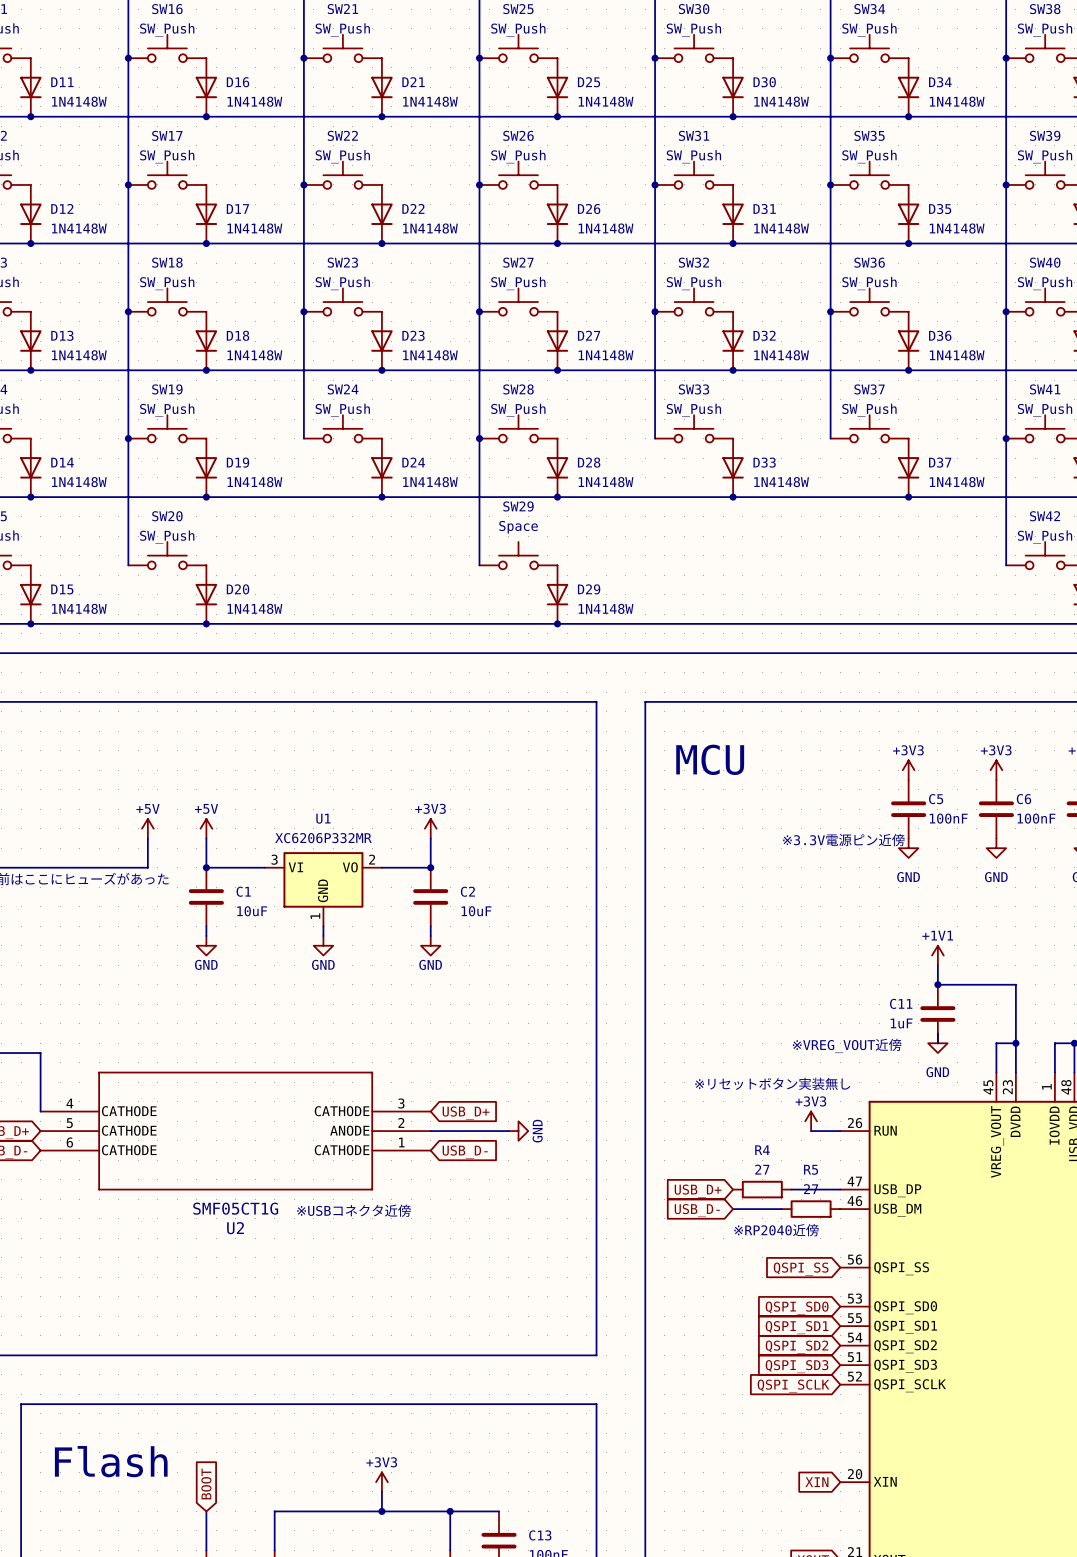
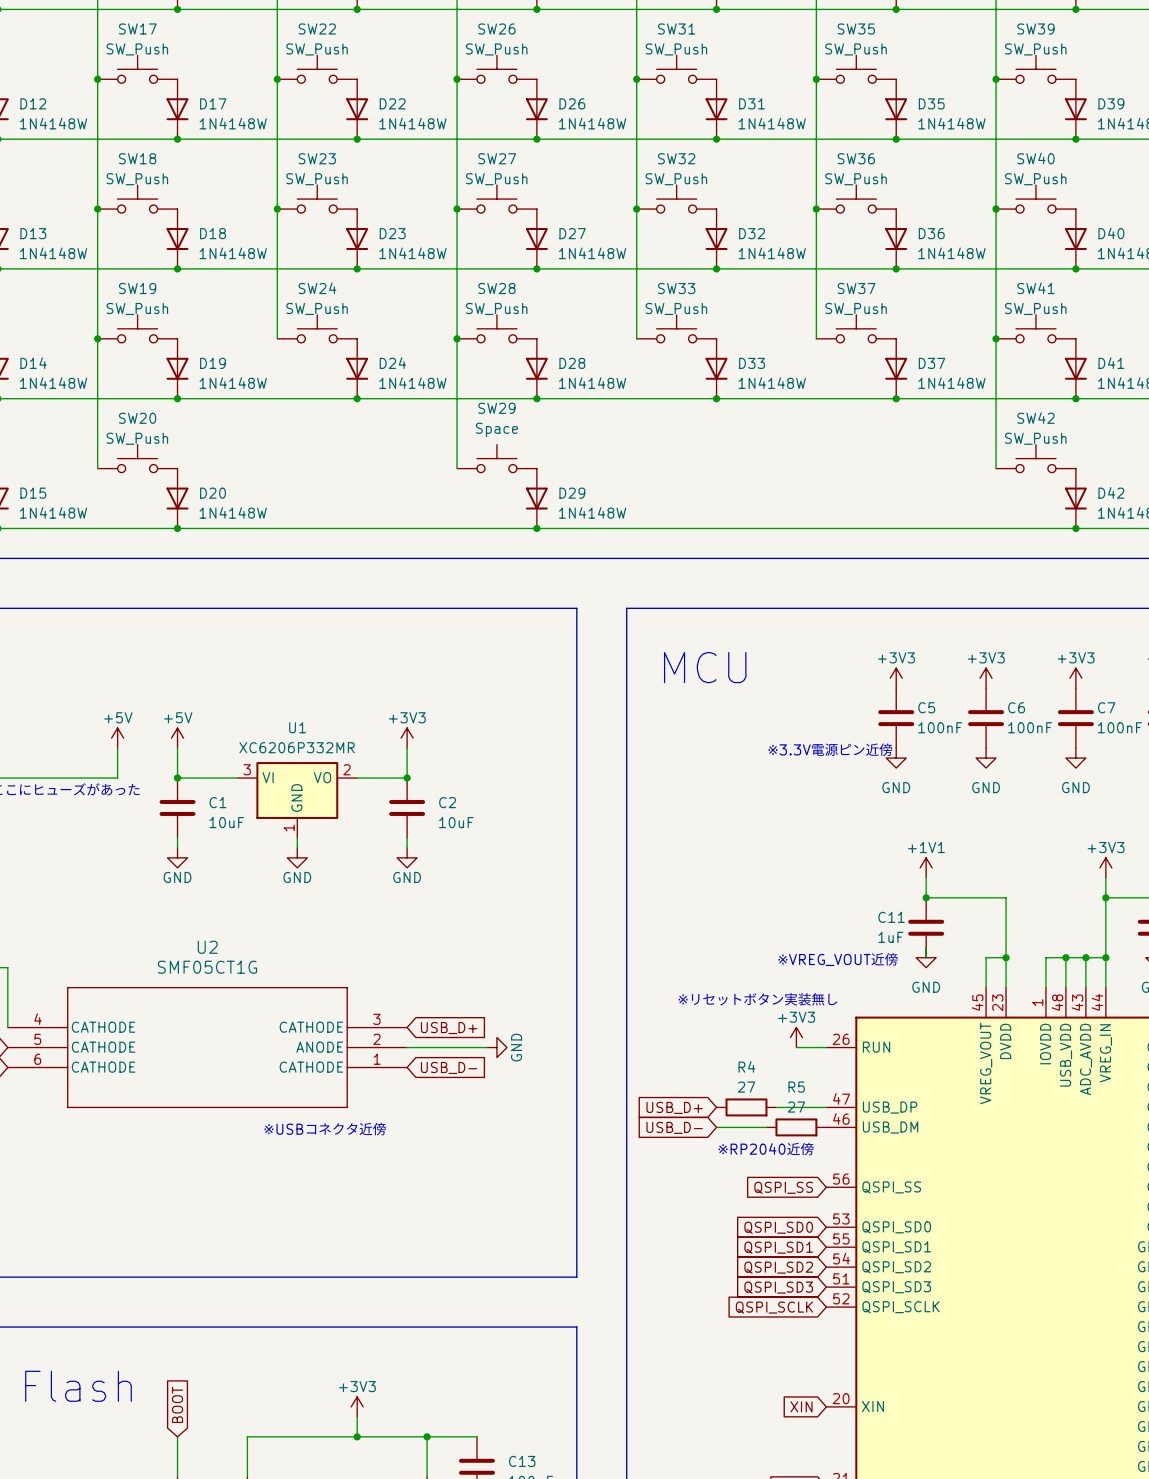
U2 value position: SMF05CT1G (235, 1208) -> SMF05CT1G (207, 967)
U2 name position: U2 (235, 1228) -> U2 (207, 947)

